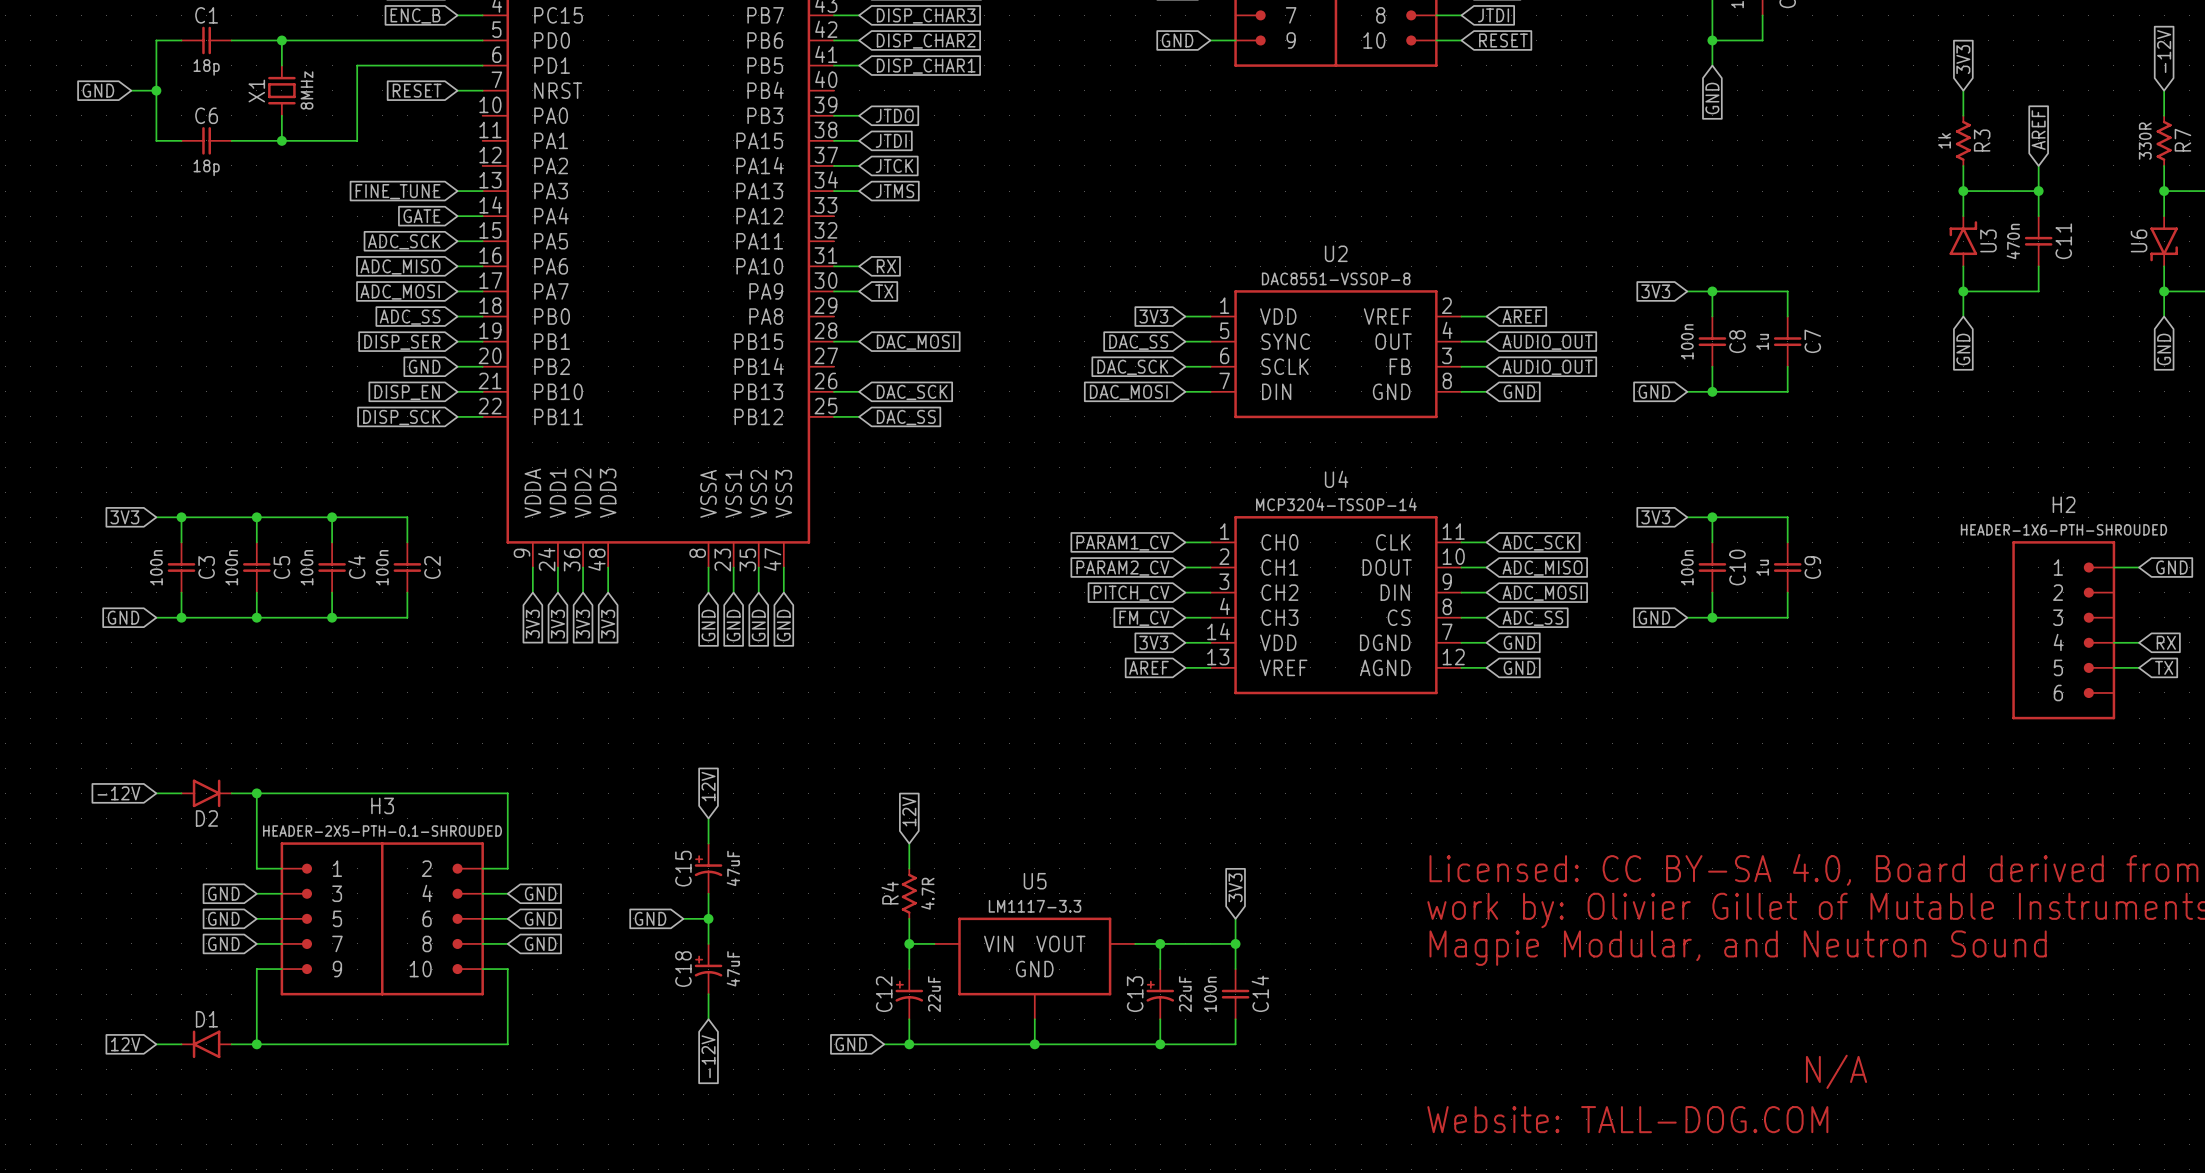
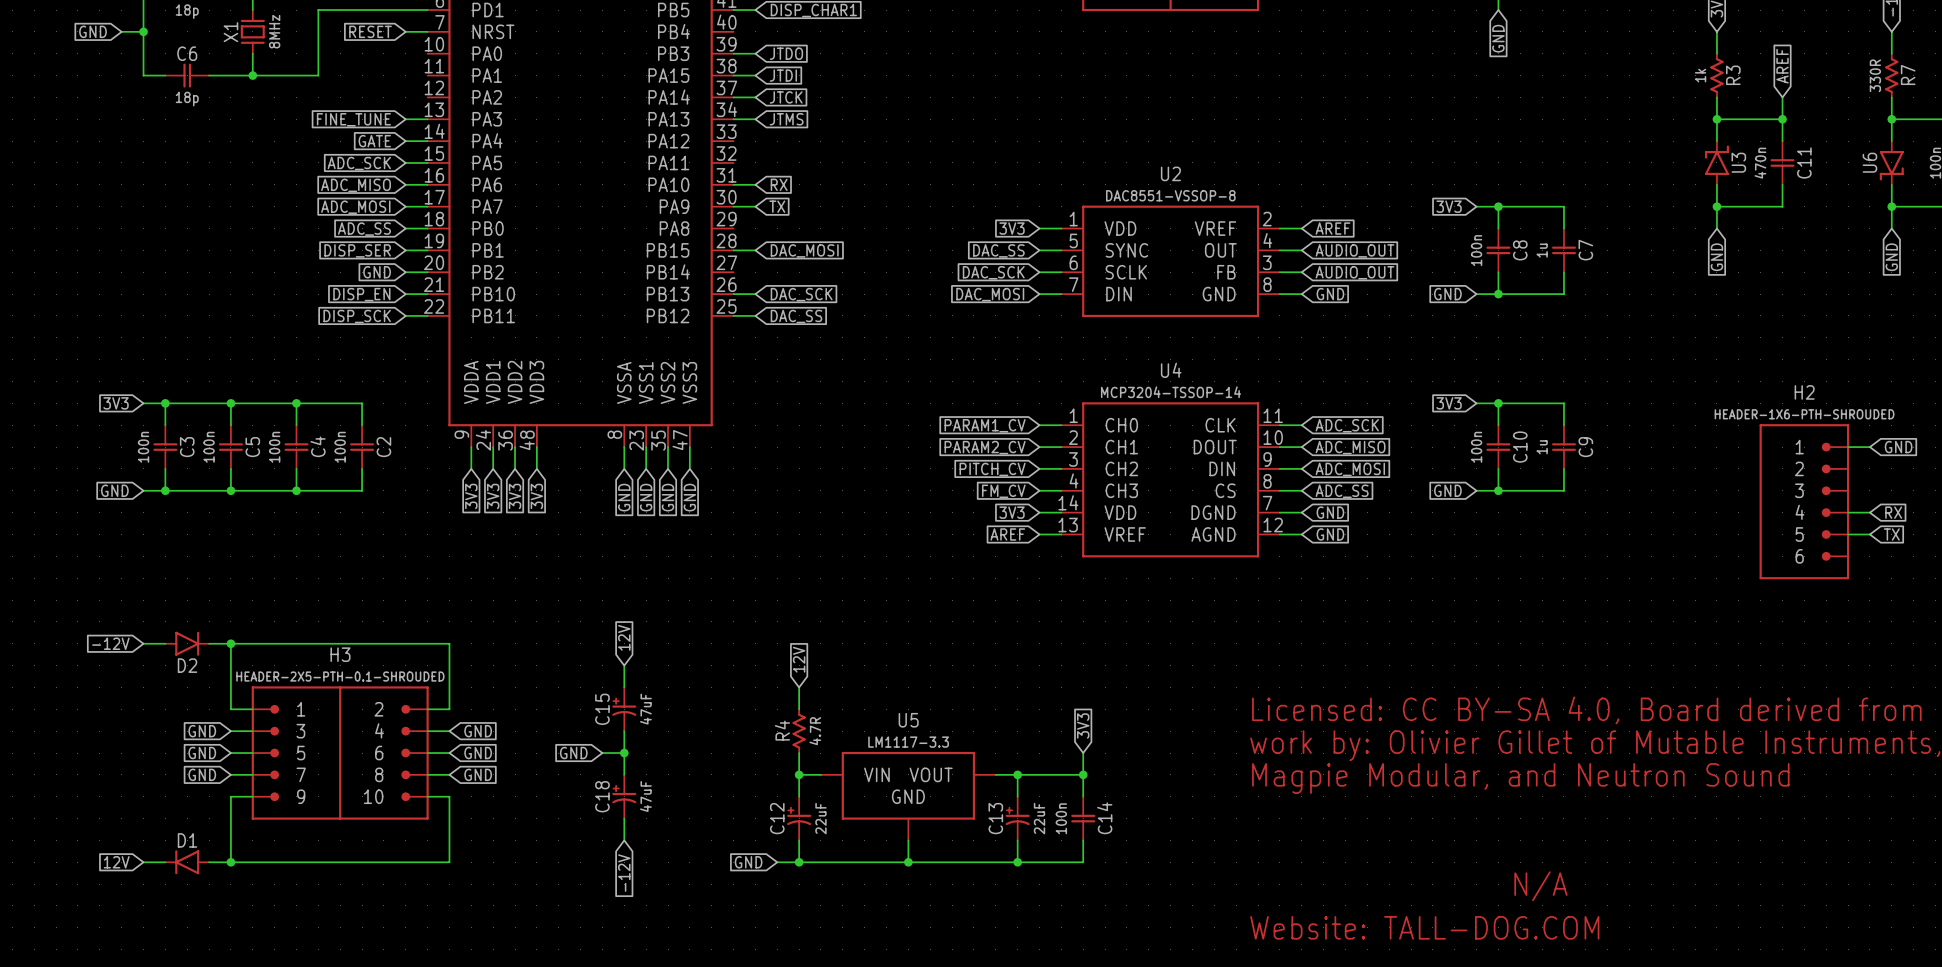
text position: N/A (1836, 1071) -> N/A (1540, 886)

